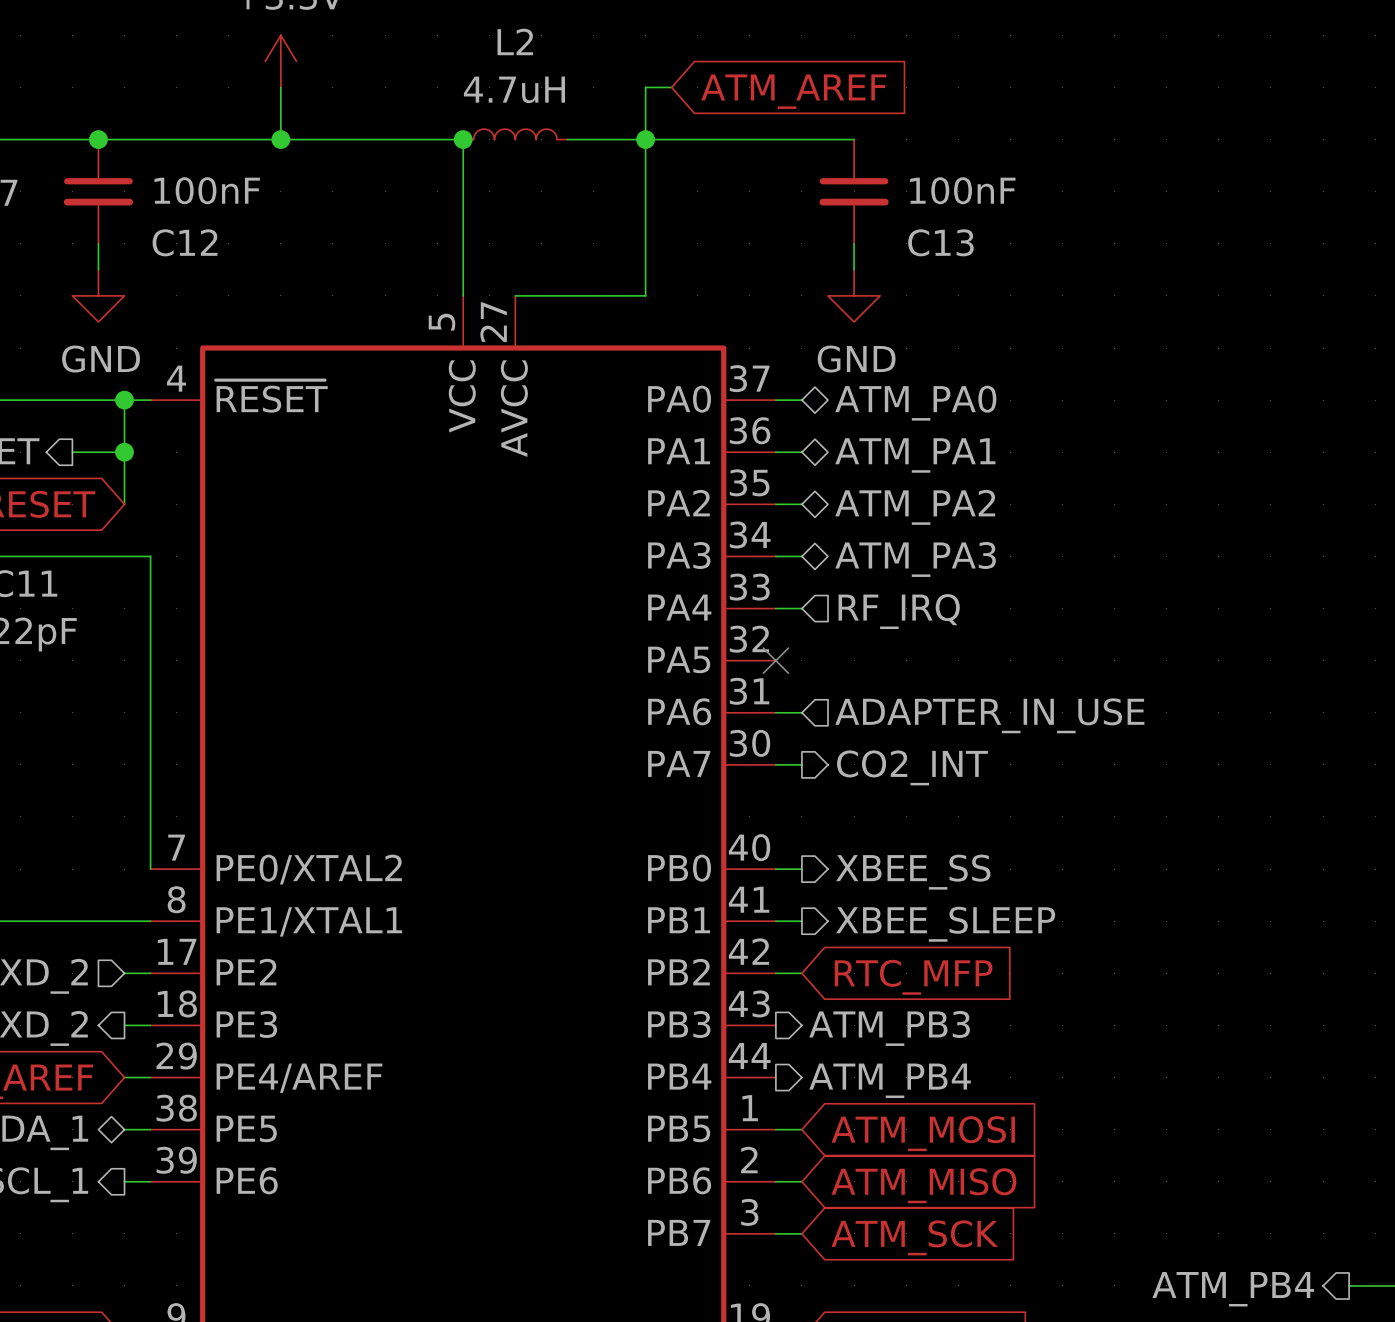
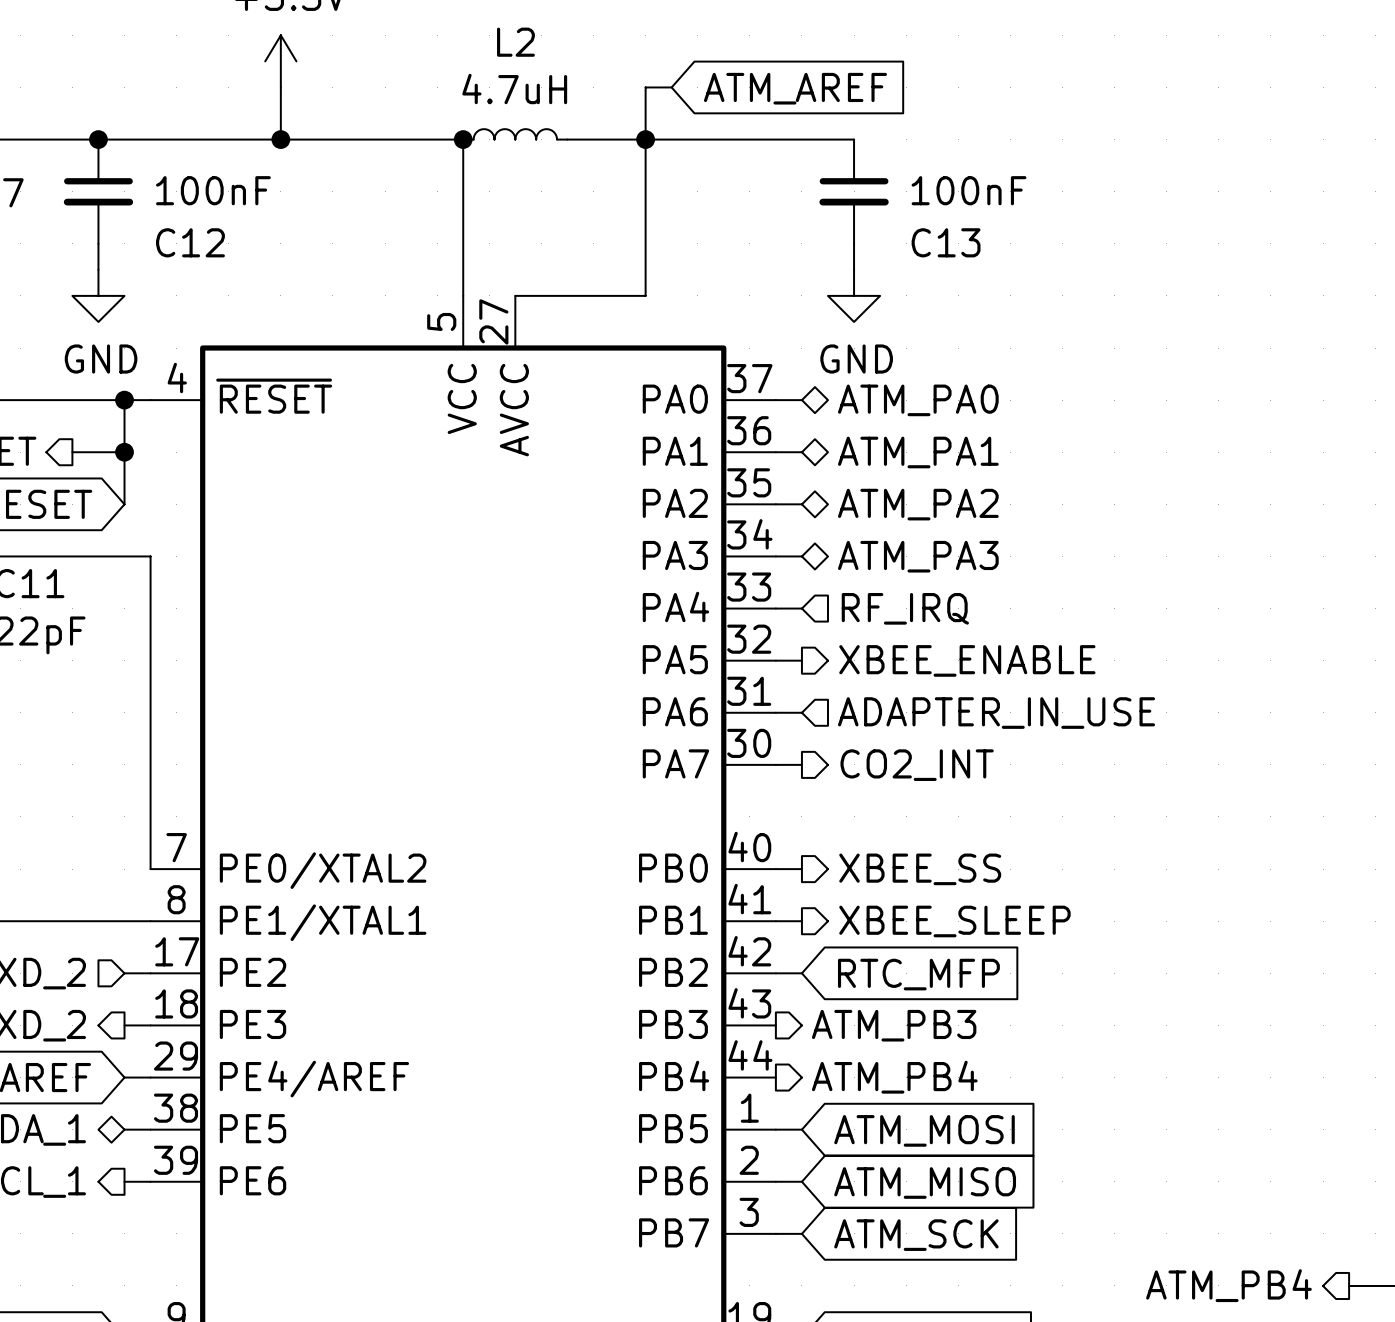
wire: none -> (775, 660) (801, 660)
no-connect mark: (775, 660) -> none
hierarchical label: none -> XBEE_ENABLE (967, 660)

